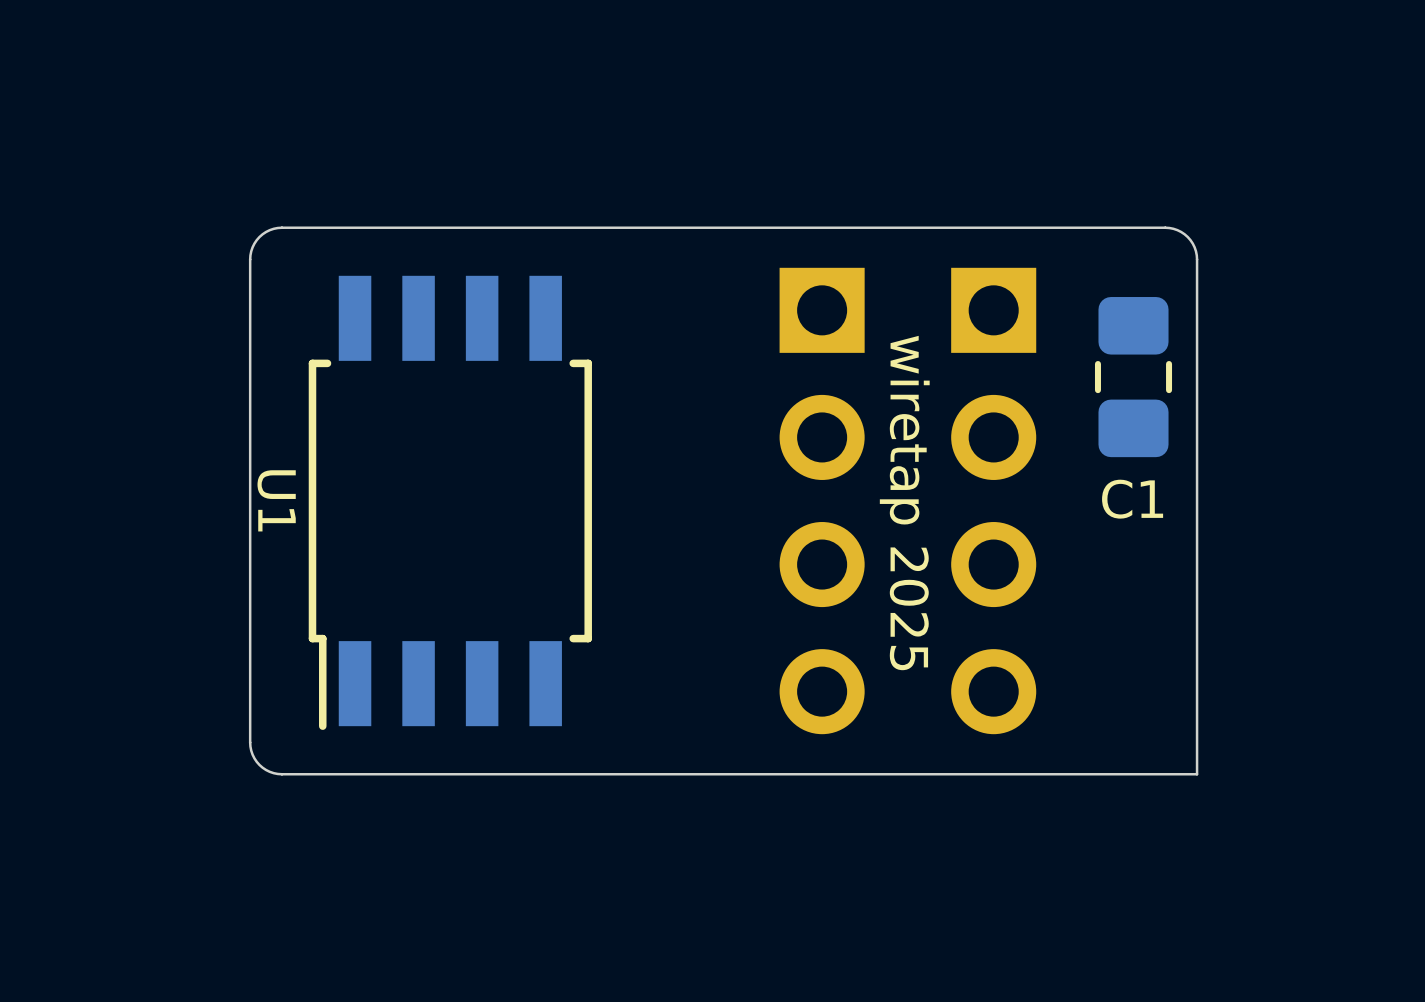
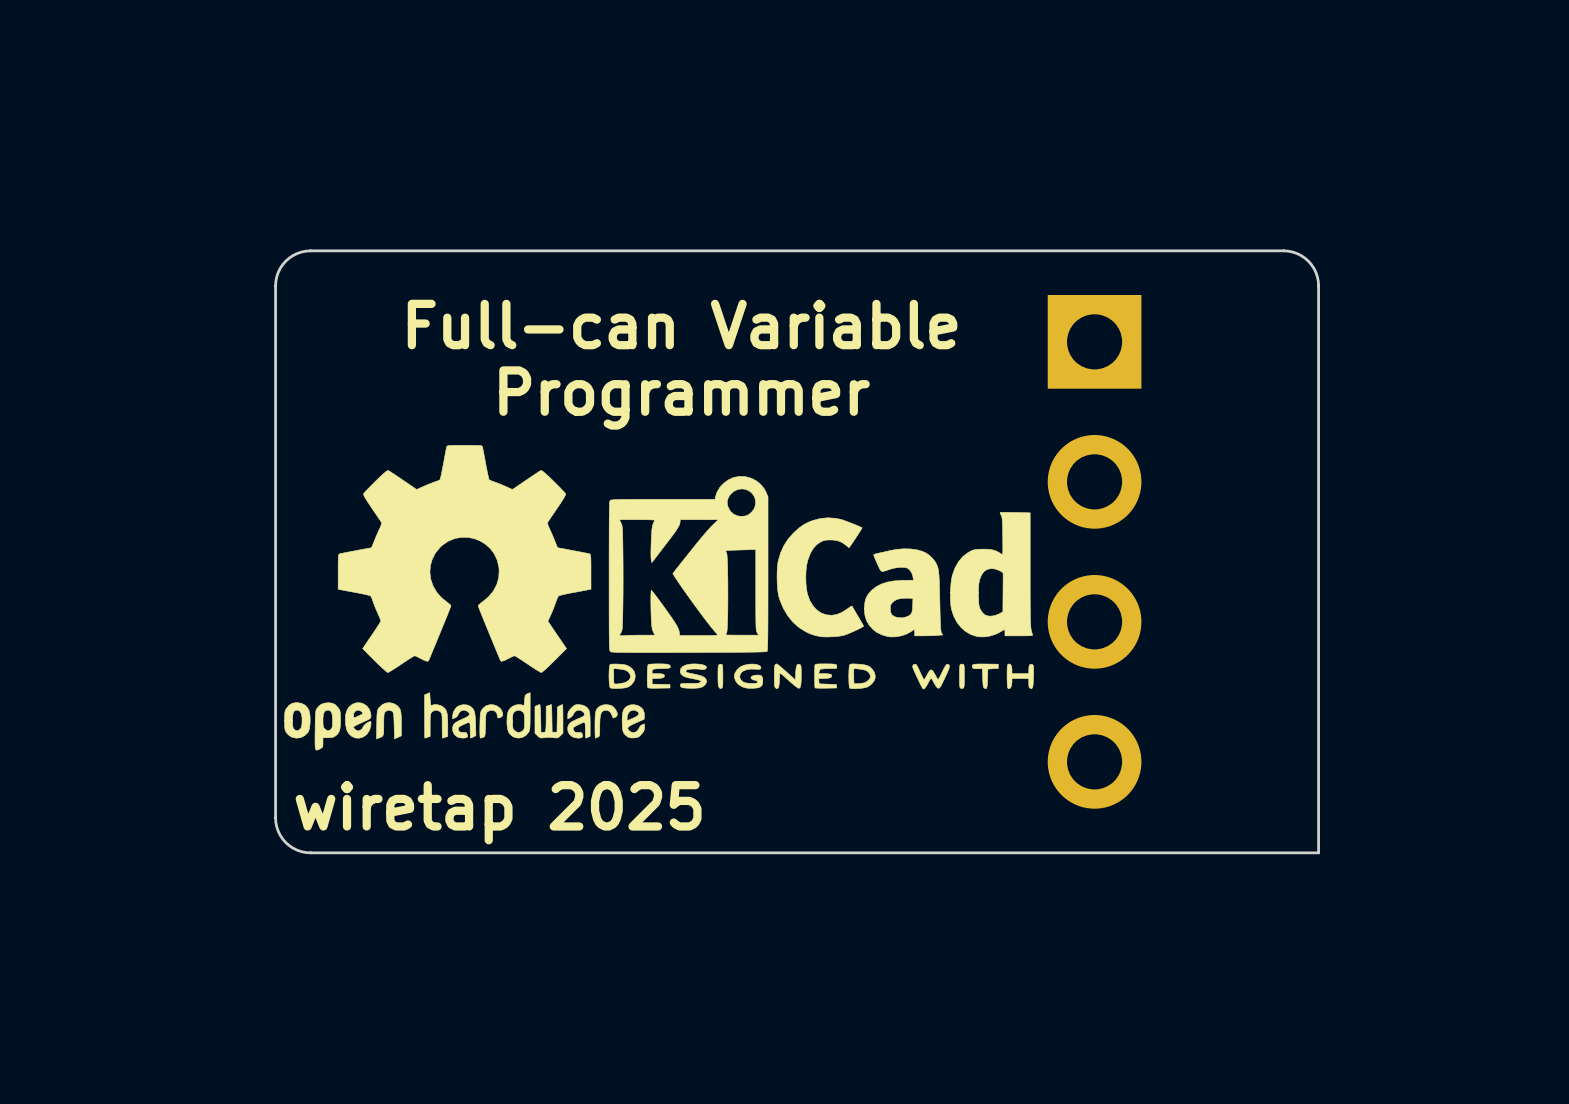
text: none -> Full-can Variable (682, 324)
text: none -> Programmer (684, 397)
C1: (1133, 377) -> none
drawing: none -> [284, 445, 1034, 751]
part: (822, 500) -> none
U1: (450, 502) -> none
text rotation: 0° (904, 503) -> 90° counterclockwise (498, 812)
text position: wiretap 2025 (904, 503) -> wiretap 2025 (498, 812)

